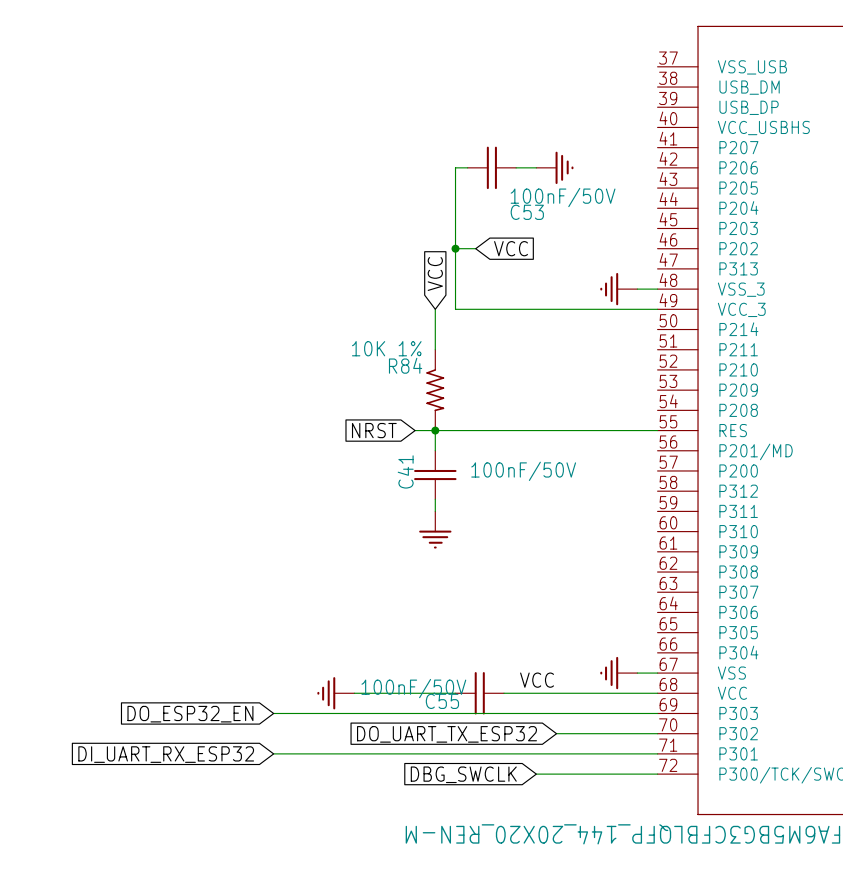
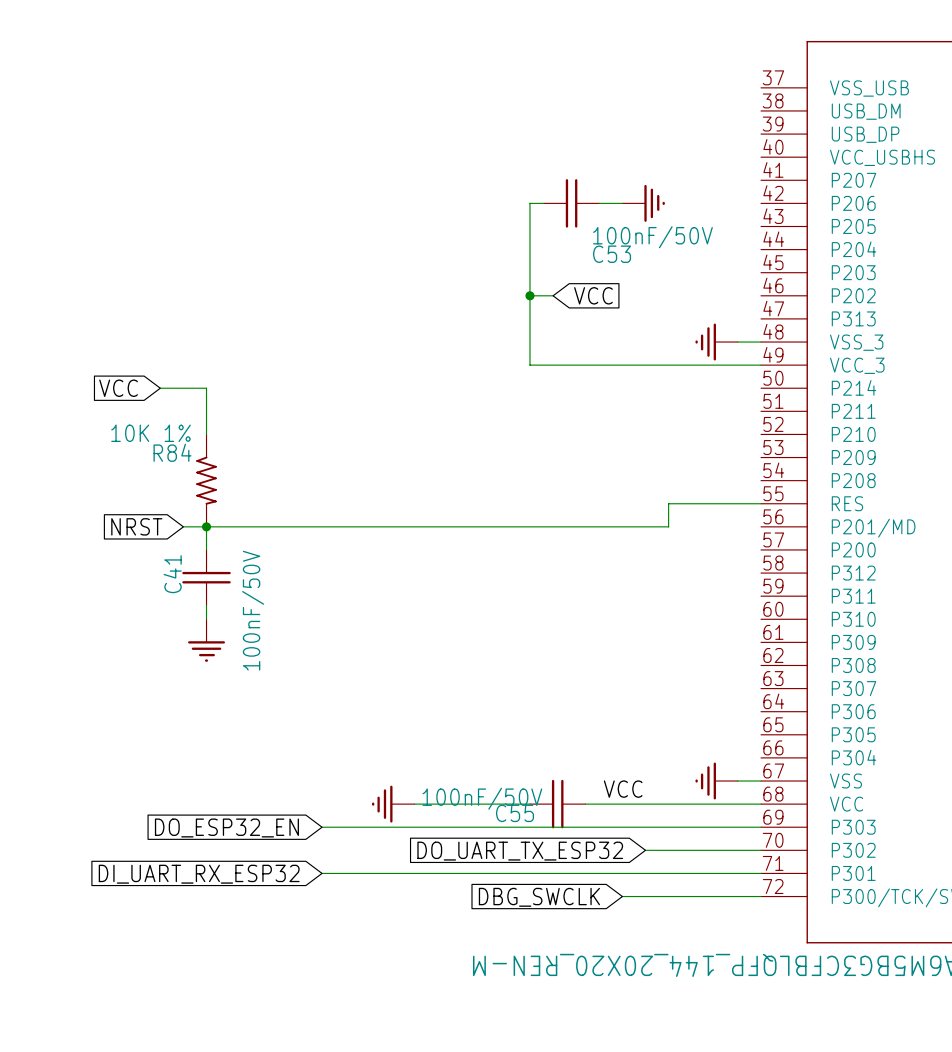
global label: VCC (435, 274) -> none
wire: (435, 309) (435, 349) -> none
global label: none -> VCC (118, 388)
wire: none -> (160, 388) (206, 388) (206, 434)
R84 position: (435, 390) -> (206, 480)
global label: NRST (374, 430) -> none
wire: (415, 430) (576, 430) -> (183, 526) (668, 526) (668, 503)
wire: (435, 430) (435, 450) -> none
junction: (435, 430) -> none
global label: none -> NRST (136, 526)
wire: none -> (206, 526) (206, 549)
junction: none -> (206, 526)
C41 value rotation: 0° (523, 471) -> 90° counterclockwise (253, 610)
C41 position: (435, 475) -> (206, 577)
wire: (435, 499) (435, 511) -> none
wire: none -> (206, 605) (206, 619)
power symbol: (435, 529) -> none
power symbol: none -> (206, 640)

